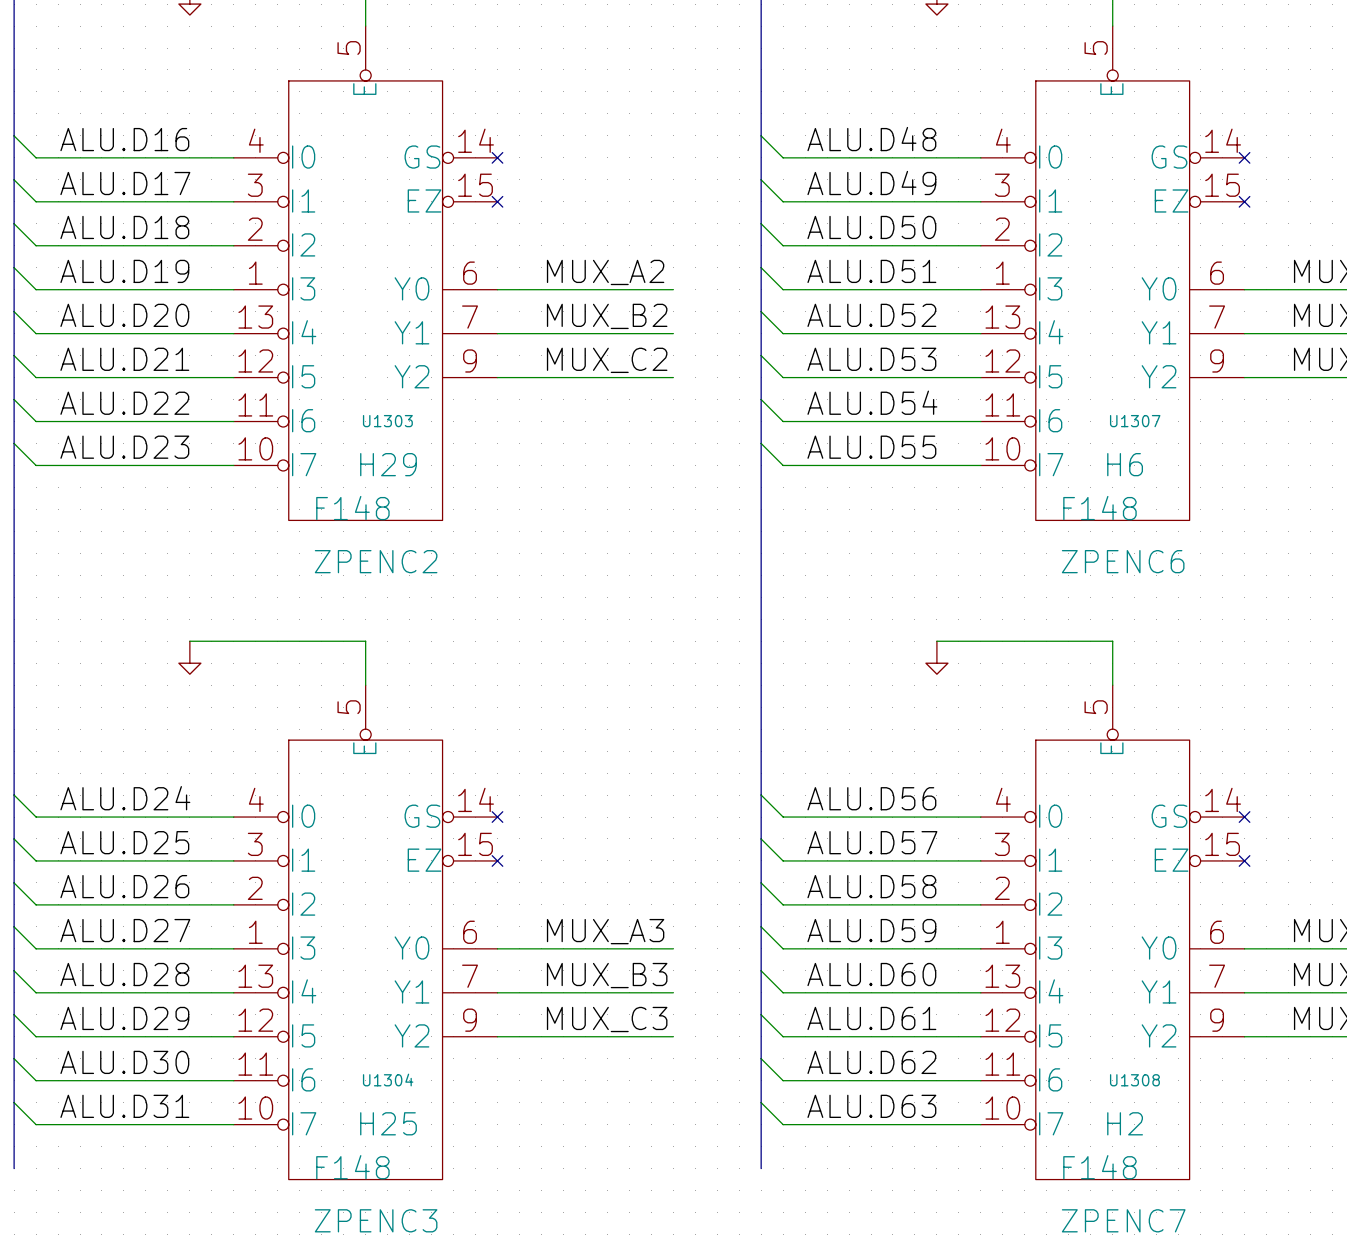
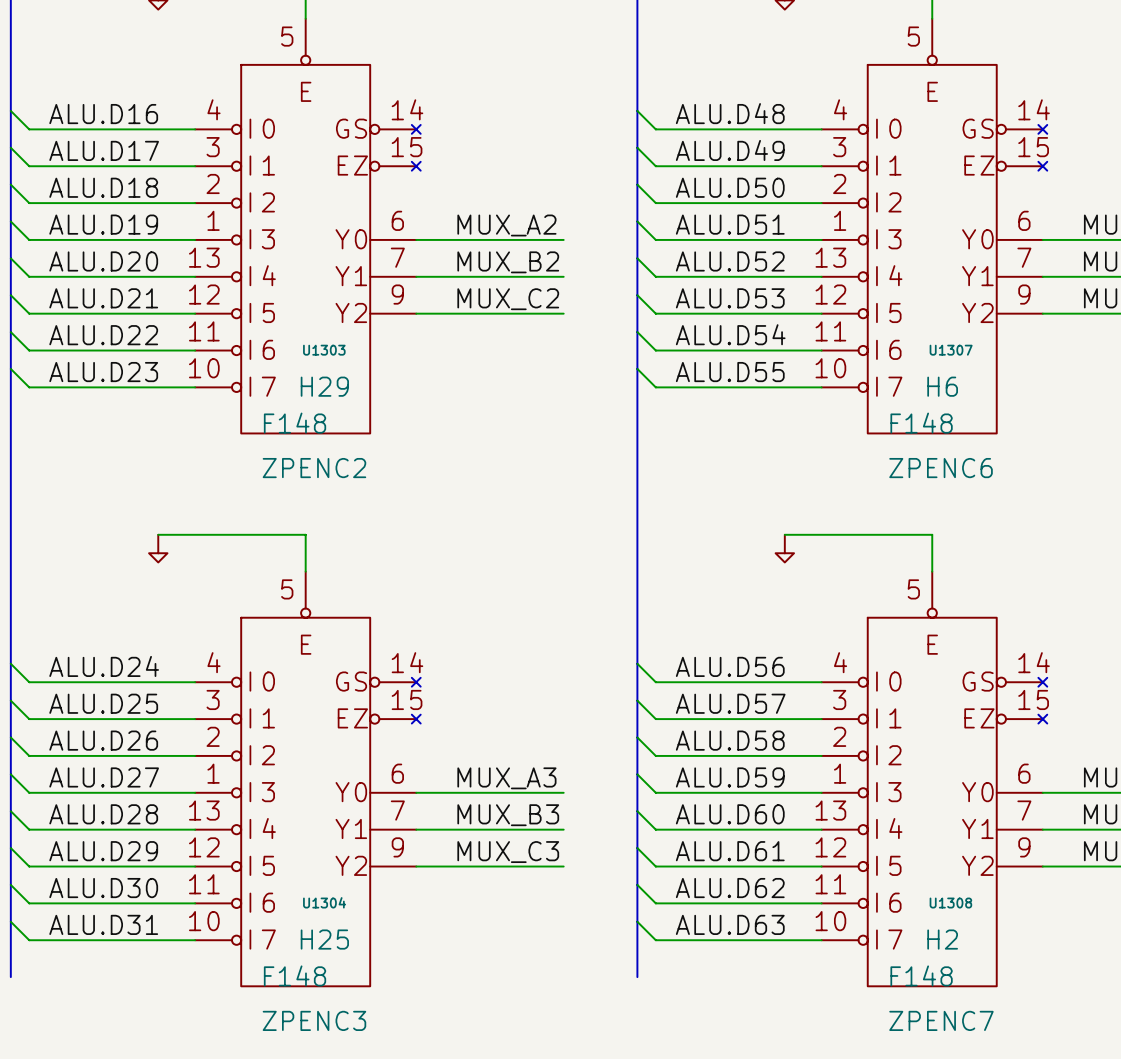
U1303 symbol: [233, 26, 498, 521] -> [195, 18, 417, 434]
U1307 symbol: [980, 26, 1245, 521] -> [821, 18, 1043, 434]
U1304 symbol: [233, 685, 498, 1180] -> [195, 571, 417, 987]
U1308 symbol: [980, 685, 1245, 1180] -> [821, 571, 1043, 987]

